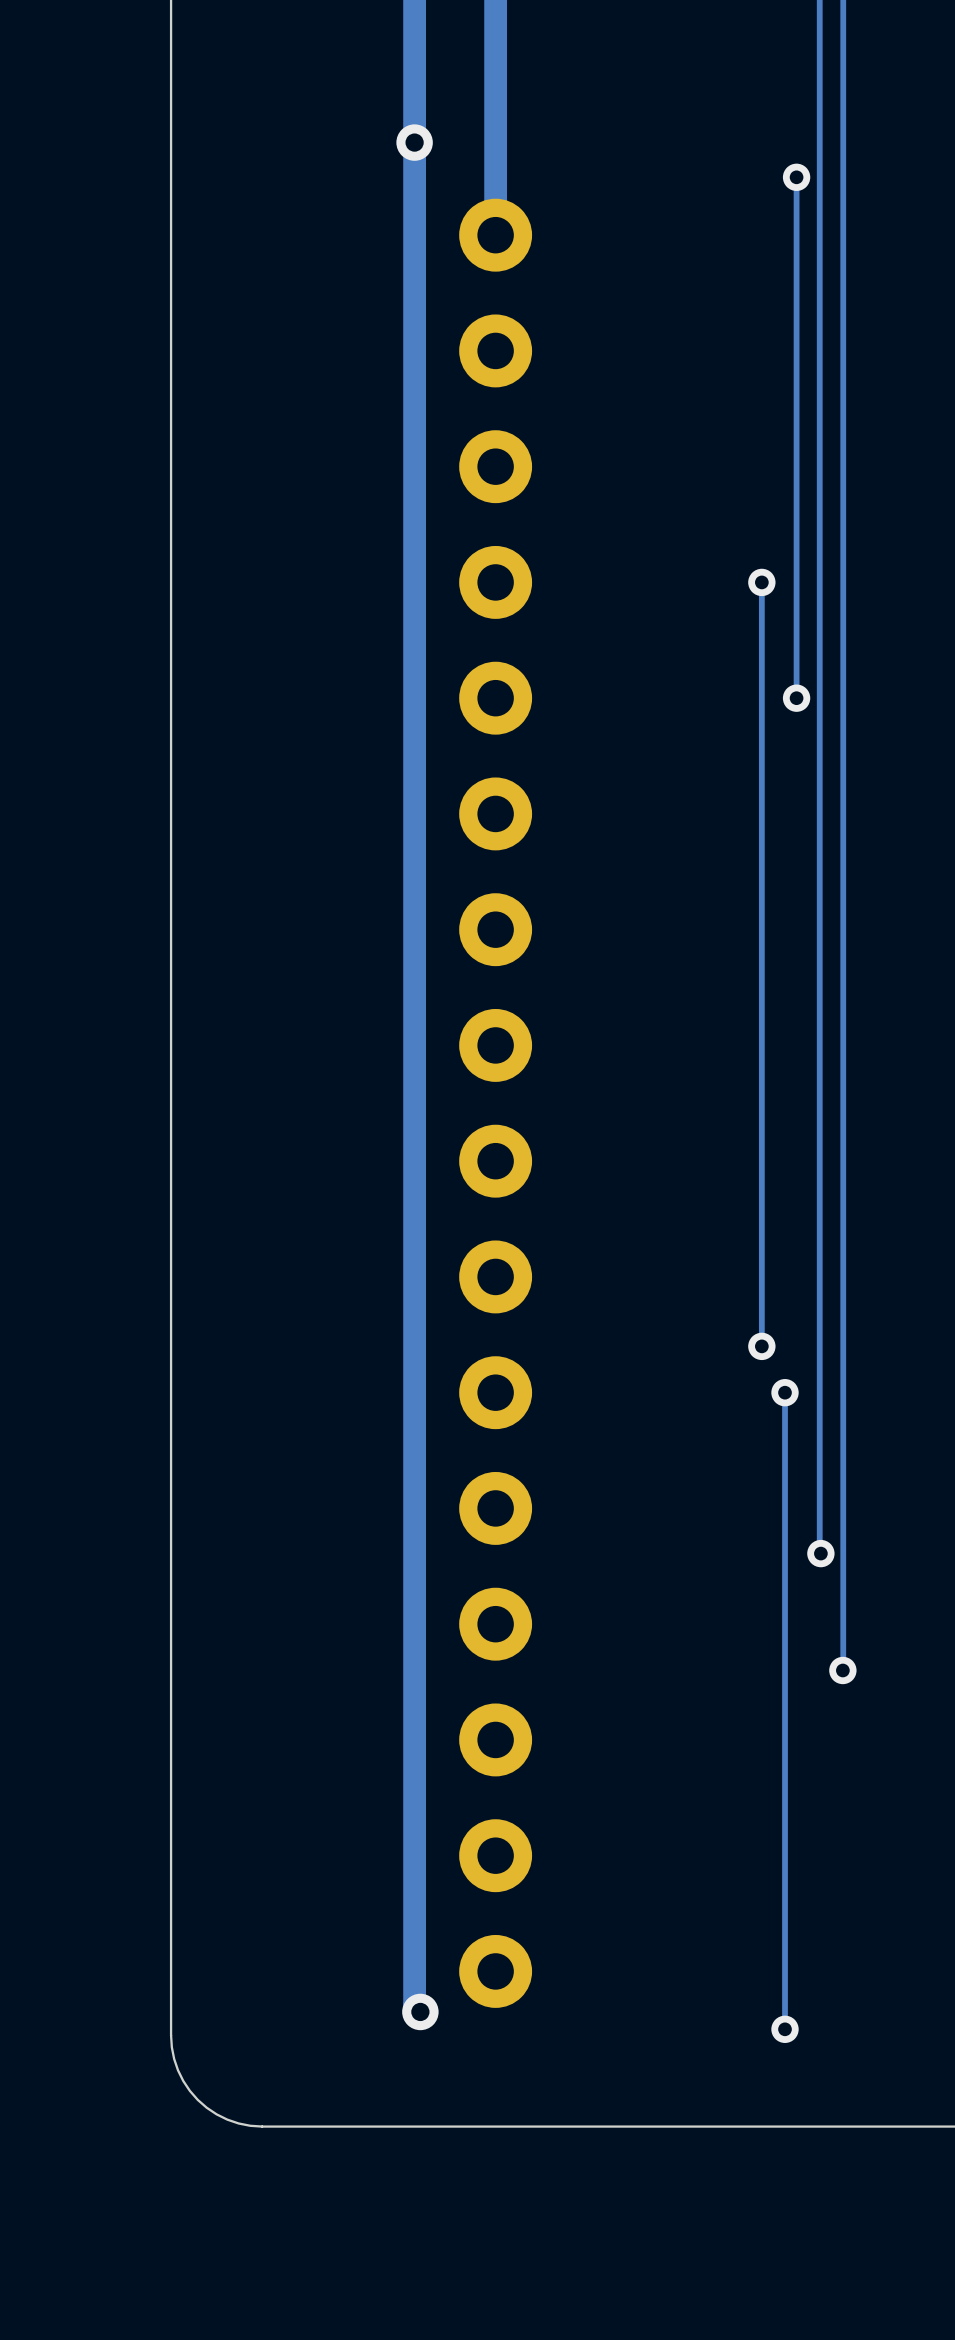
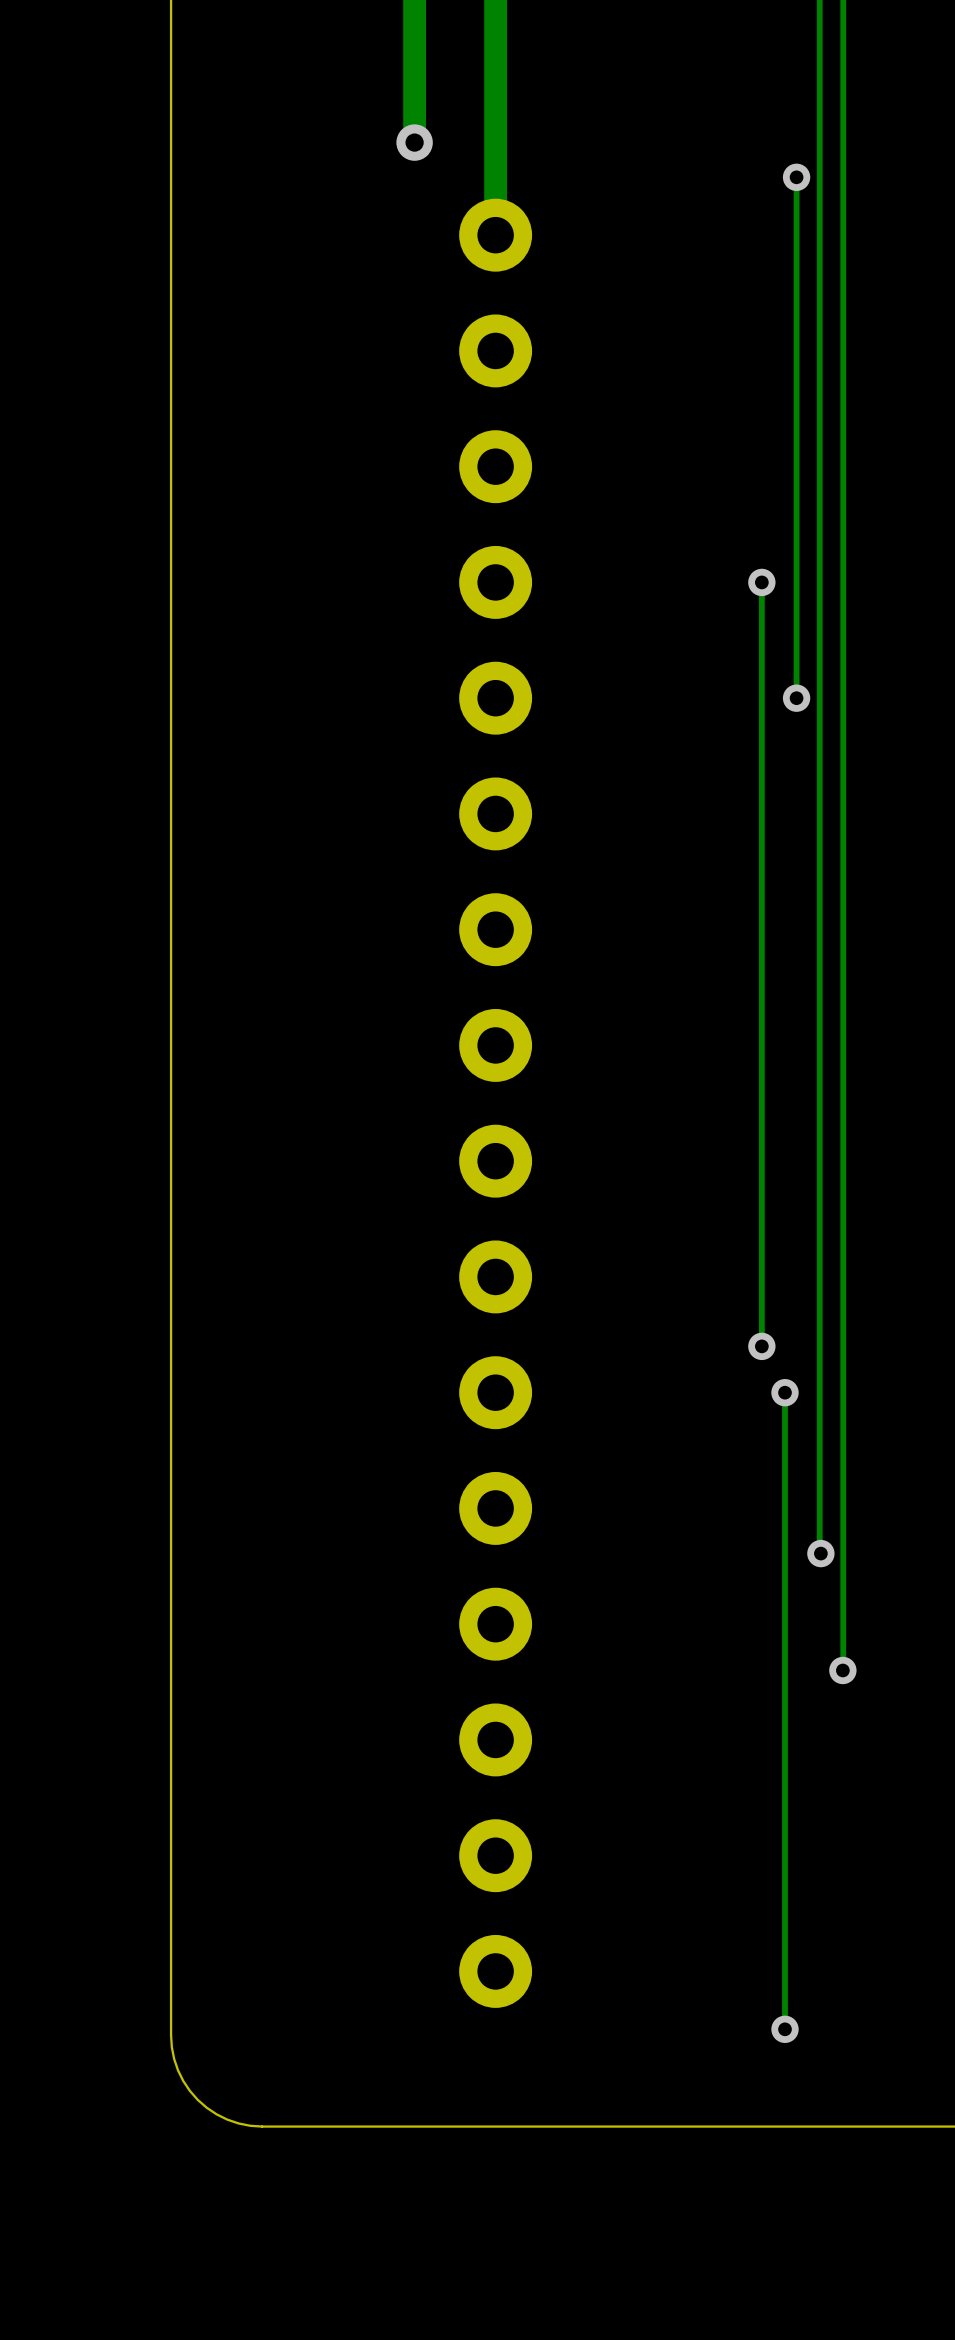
track: (414, 142) (414, 2006) (420, 2011) -> none
via: (420, 2011) -> none

